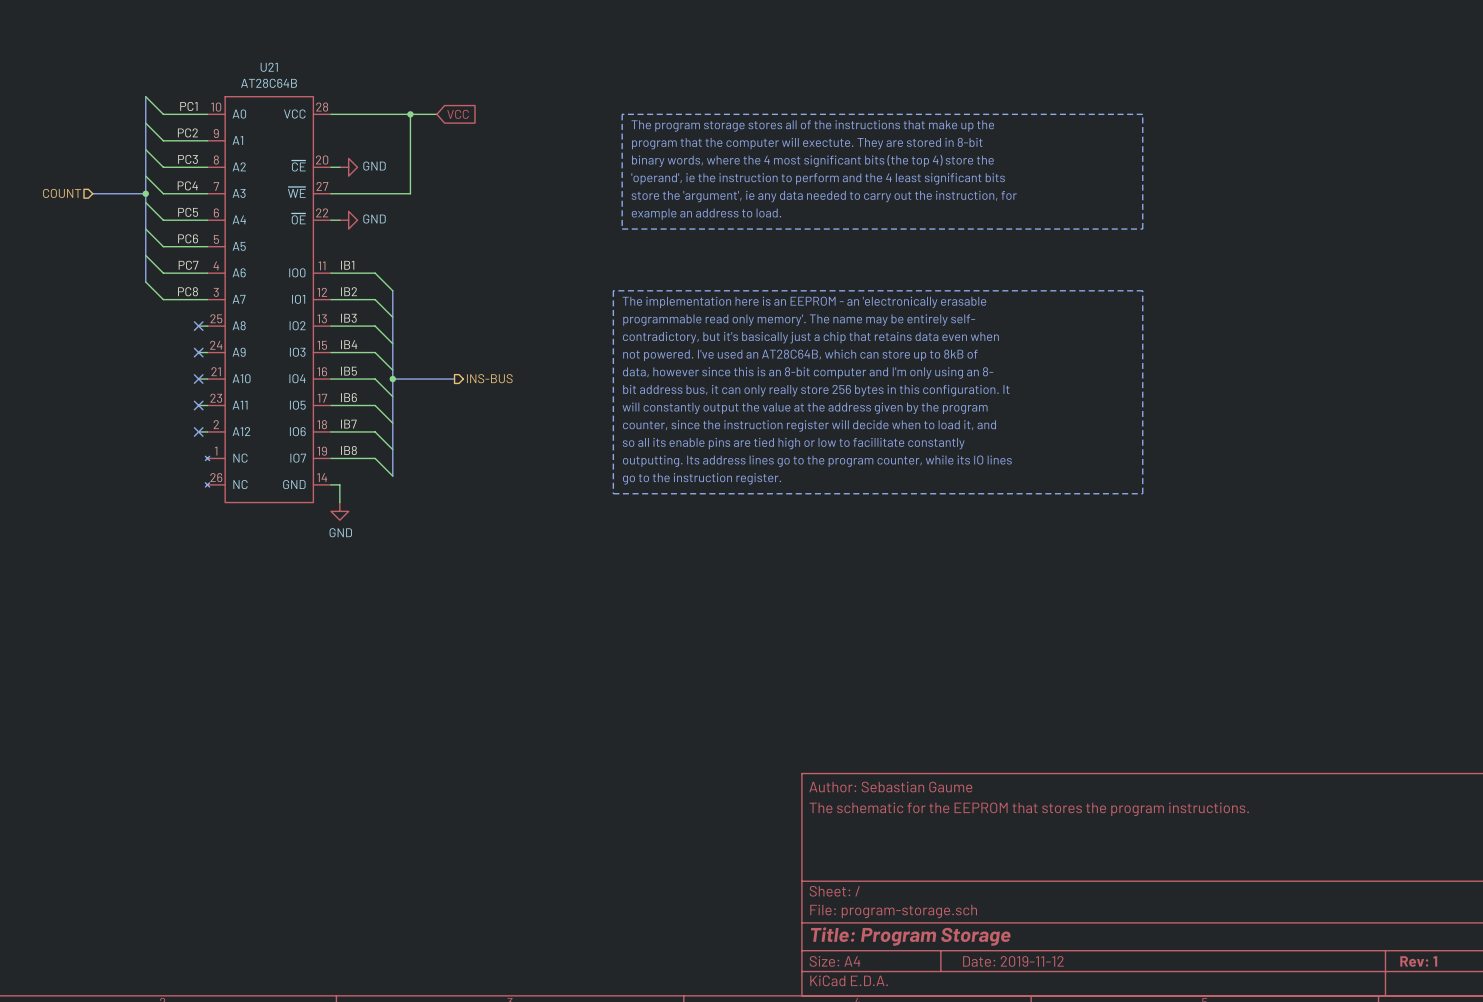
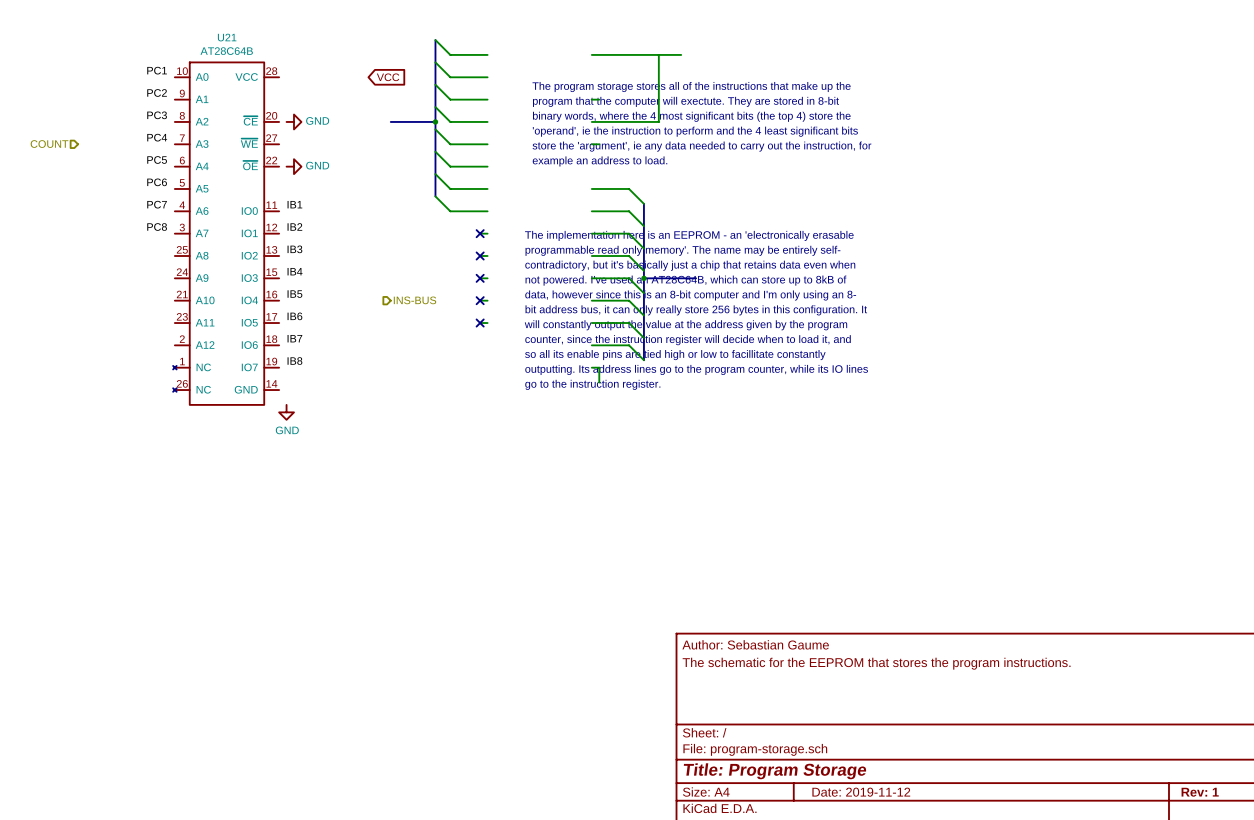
wire: none -> (435, 40) (450, 54) (487, 54)
bus: none -> (435, 40) (435, 196)
wire: none -> (591, 54) (681, 54)
wire: none -> (658, 54) (658, 121) (591, 121)
wire: (145, 96) (163, 114) (207, 114) -> none
bus: (145, 96) (145, 281) -> none
wire: none -> (435, 62) (450, 77) (487, 77)
wire: (331, 114) (436, 114) -> none
wire: (410, 114) (410, 193) (331, 193) -> none
junction: (410, 114) -> none
line: (622, 114) (622, 229) (1142, 229) (1142, 114) (622, 114) -> none
wire: (145, 123) (163, 140) (207, 140) -> none
wire: none -> (435, 84) (450, 99) (487, 99)
wire: none -> (591, 99) (599, 99)
wire: (145, 149) (163, 167) (207, 167) -> none
wire: none -> (435, 107) (450, 121) (487, 121)
wire: (331, 167) (339, 167) -> none
bus: none -> (390, 121) (435, 121)
junction: none -> (435, 121)
wire: (145, 176) (163, 193) (207, 193) -> none
wire: none -> (435, 129) (450, 144) (487, 144)
bus: (92, 193) (145, 193) -> none
junction: (145, 193) -> none
wire: none -> (591, 144) (599, 144)
wire: (145, 202) (163, 220) (207, 220) -> none
wire: none -> (435, 151) (450, 166) (487, 166)
wire: (331, 220) (339, 220) -> none
wire: (145, 229) (163, 246) (207, 246) -> none
wire: none -> (435, 174) (450, 188) (487, 188)
wire: none -> (591, 188) (629, 188) (643, 203)
wire: (145, 255) (163, 273) (207, 273) -> none
wire: none -> (435, 196) (450, 211) (487, 211)
bus: none -> (643, 203) (643, 360)
wire: (331, 273) (375, 273) (392, 290) -> none
wire: none -> (591, 211) (629, 211) (643, 226)
wire: (145, 281) (163, 299) (207, 299) -> none
bus: (392, 290) (392, 476) -> none
line: (613, 290) (613, 493) (1142, 493) (1142, 290) (613, 290) -> none
wire: (331, 299) (375, 299) (392, 317) -> none
wire: none -> (480, 233) (487, 233)
no-connect mark: none -> (480, 233)
wire: none -> (591, 233) (629, 233) (643, 248)
wire: (198, 326) (207, 326) -> none
no-connect mark: (198, 326) -> none
wire: (331, 326) (375, 326) (392, 343) -> none
wire: none -> (480, 256) (487, 256)
no-connect mark: none -> (480, 256)
wire: none -> (591, 256) (629, 256) (643, 270)
wire: (198, 352) (207, 352) -> none
no-connect mark: (198, 352) -> none
wire: (331, 352) (375, 352) (392, 370) -> none
wire: none -> (480, 278) (487, 278)
no-connect mark: none -> (480, 278)
wire: none -> (591, 278) (629, 278) (643, 293)
bus: none -> (643, 278) (696, 278)
junction: none -> (643, 278)
wire: (198, 379) (207, 379) -> none
no-connect mark: (198, 379) -> none
wire: (331, 379) (375, 379) (392, 396) -> none
bus: (392, 379) (454, 379) -> none
junction: (392, 379) -> none
wire: none -> (480, 300) (487, 300)
no-connect mark: none -> (480, 300)
wire: none -> (591, 300) (629, 300) (643, 315)
wire: (198, 405) (207, 405) -> none
no-connect mark: (198, 405) -> none
wire: (331, 405) (375, 405) (392, 423) -> none
wire: none -> (480, 323) (487, 323)
no-connect mark: none -> (480, 323)
wire: none -> (591, 323) (629, 323) (643, 337)
wire: (198, 431) (207, 431) -> none
no-connect mark: (198, 431) -> none
wire: (331, 431) (375, 431) (392, 449) -> none
wire: none -> (591, 345) (629, 345) (643, 360)
wire: (331, 458) (375, 458) (392, 476) -> none
wire: none -> (591, 367) (599, 367) (599, 382)
wire: (331, 484) (339, 484) (339, 502) -> none

